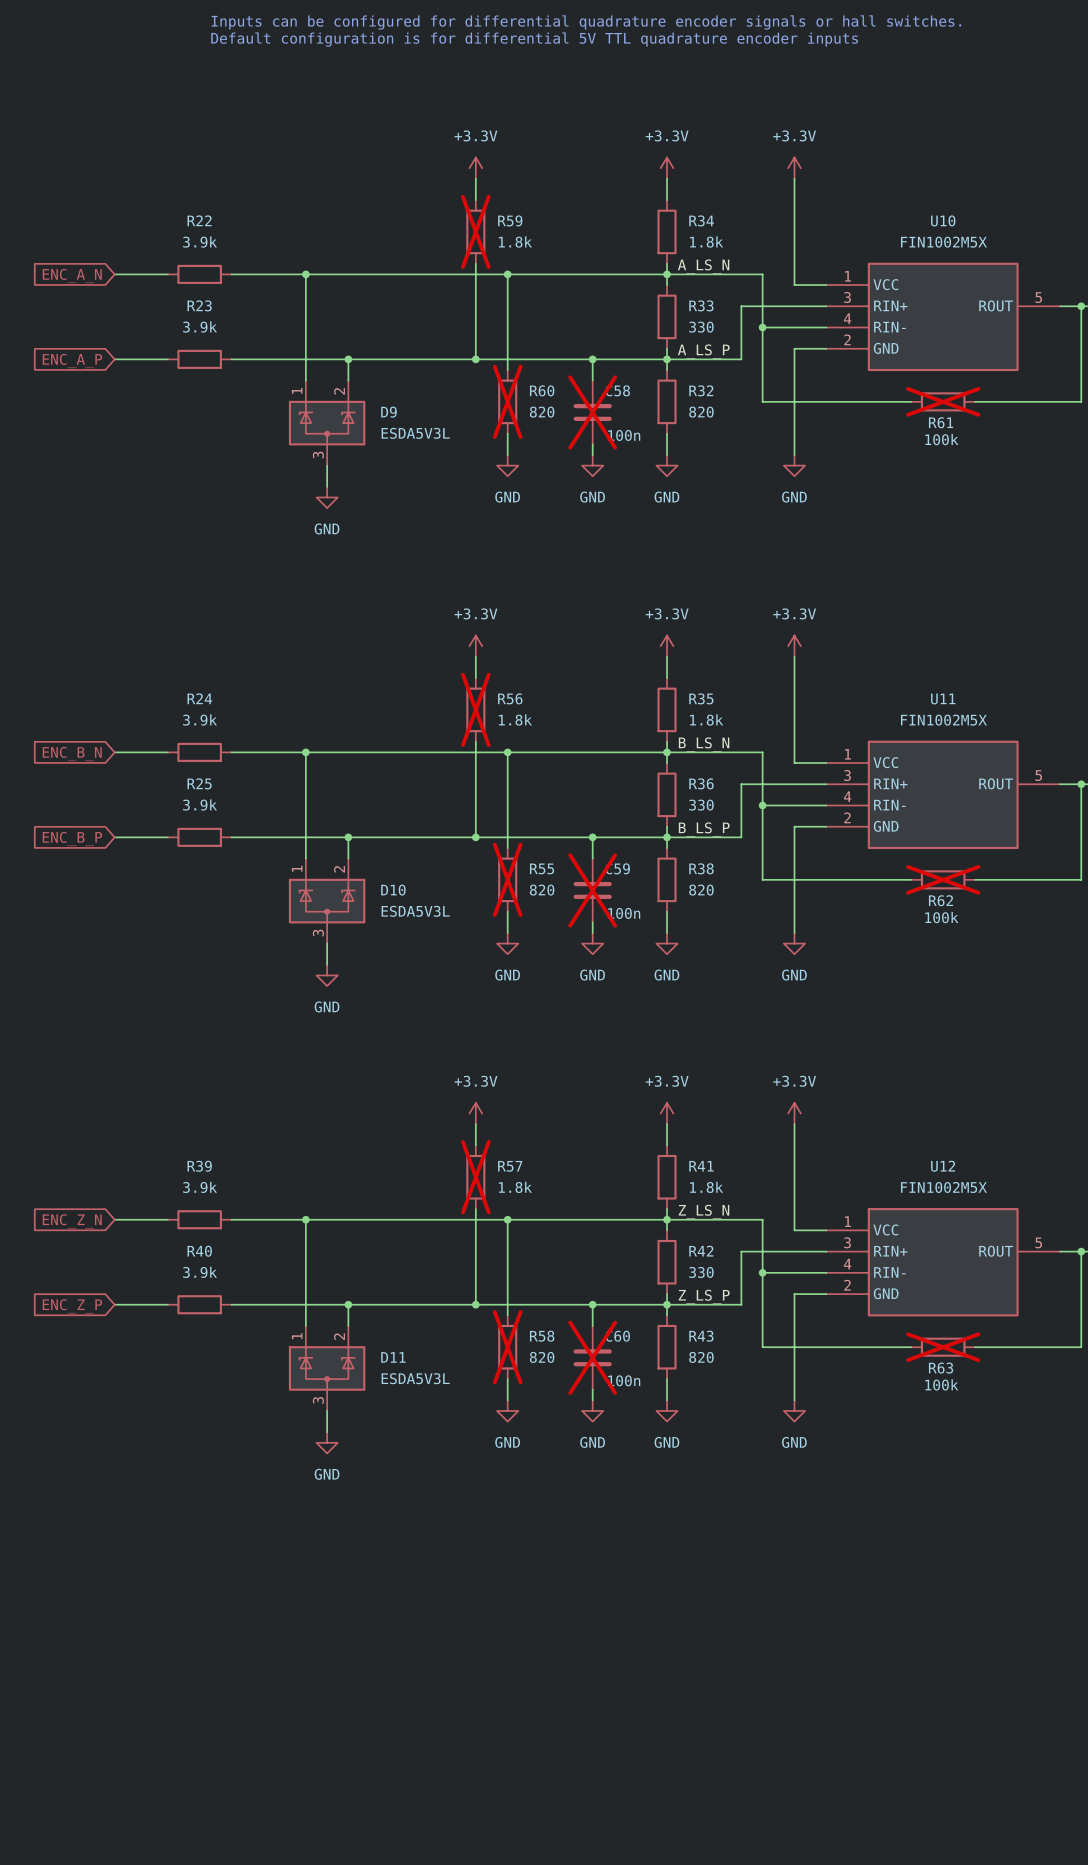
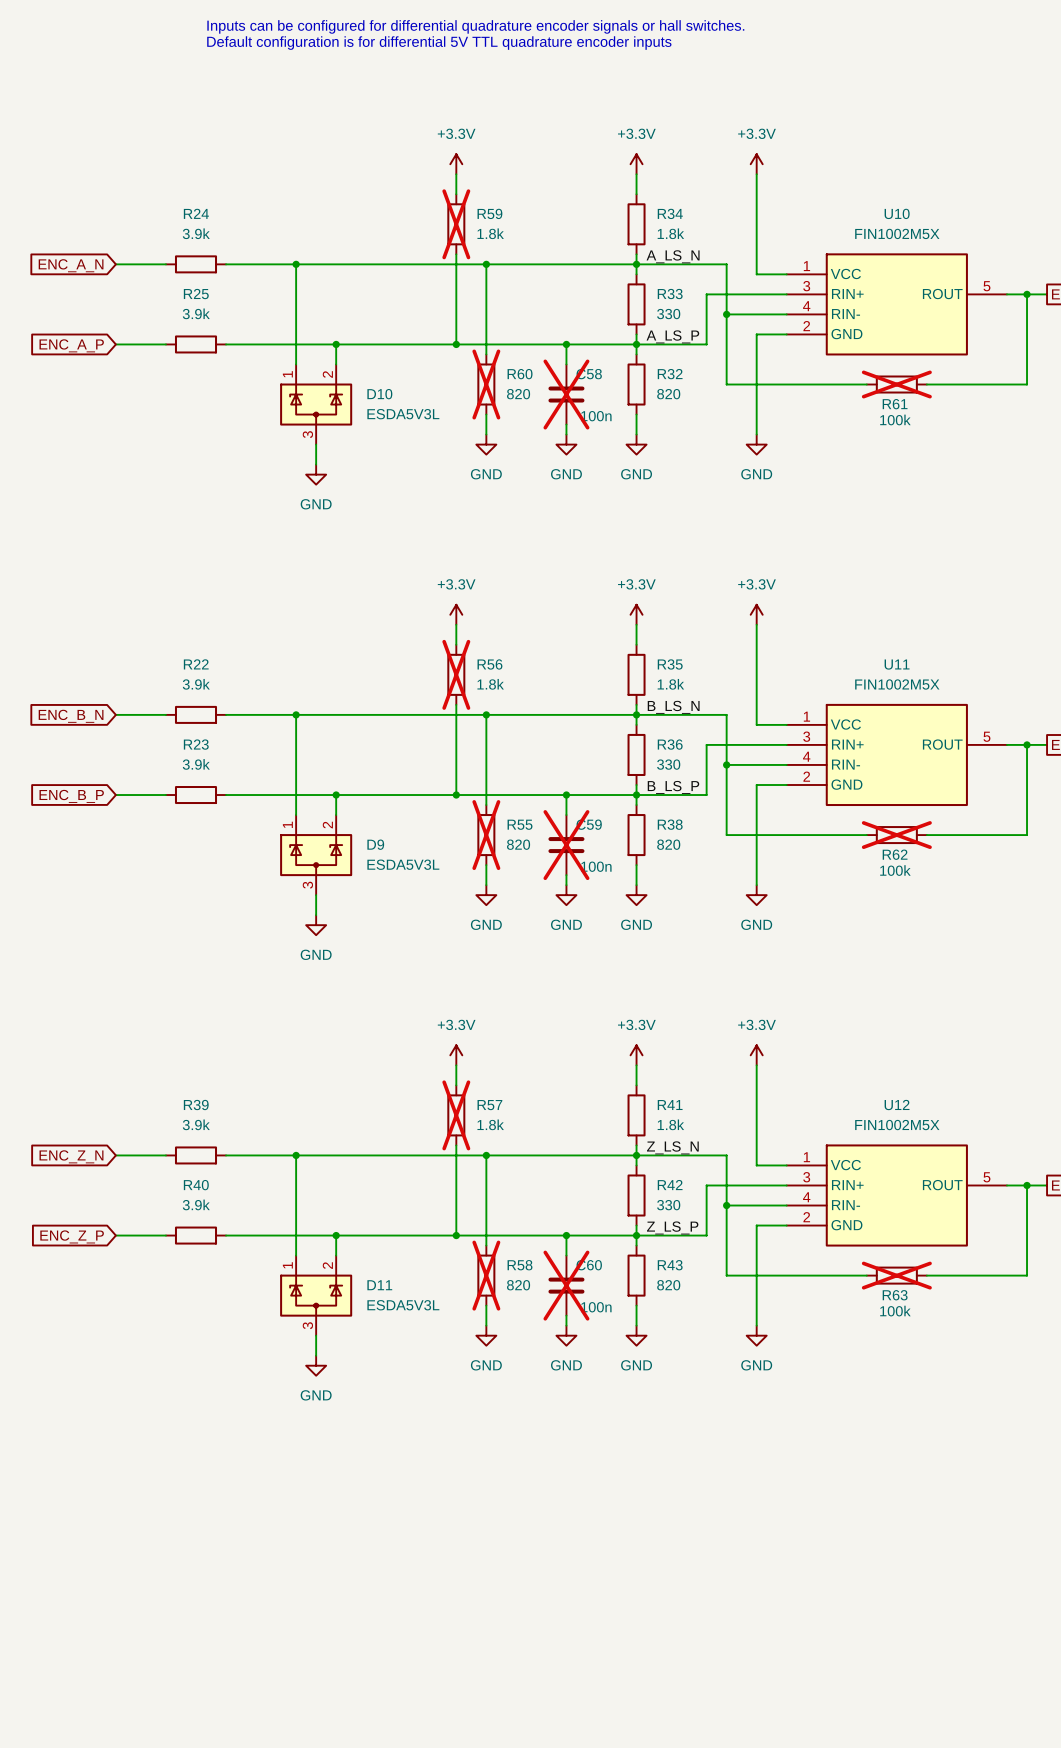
R22 name: R22 (199, 220) -> R24 (196, 213)
R23 name: R23 (199, 305) -> R25 (196, 294)
D9 name: D9 (389, 412) -> D10 (379, 394)
R24 name: R24 (199, 698) -> R22 (196, 664)
R25 name: R25 (199, 783) -> R23 (196, 744)
D10 name: D10 (393, 890) -> D9 (375, 844)

